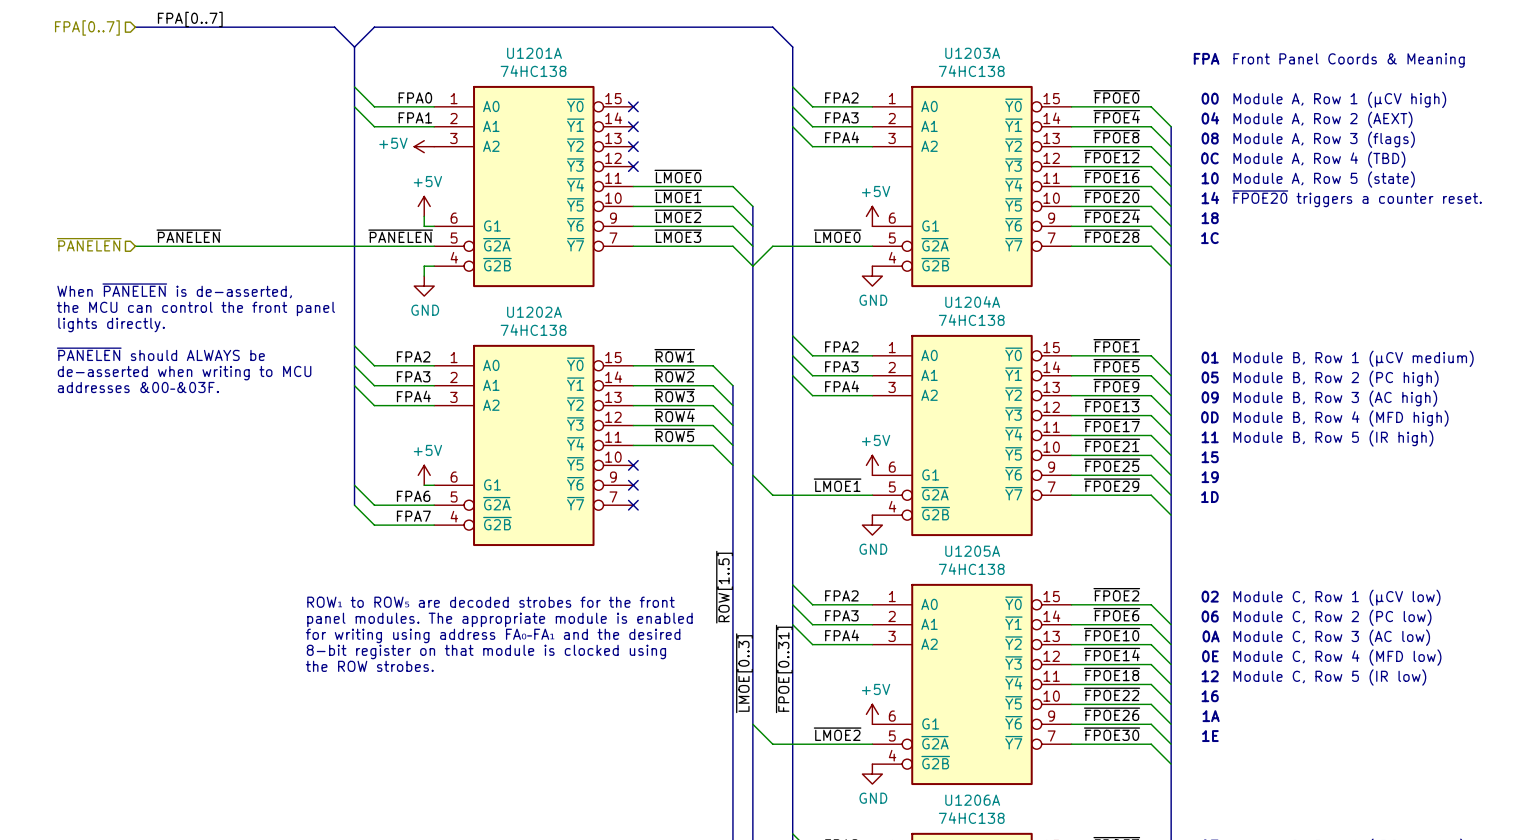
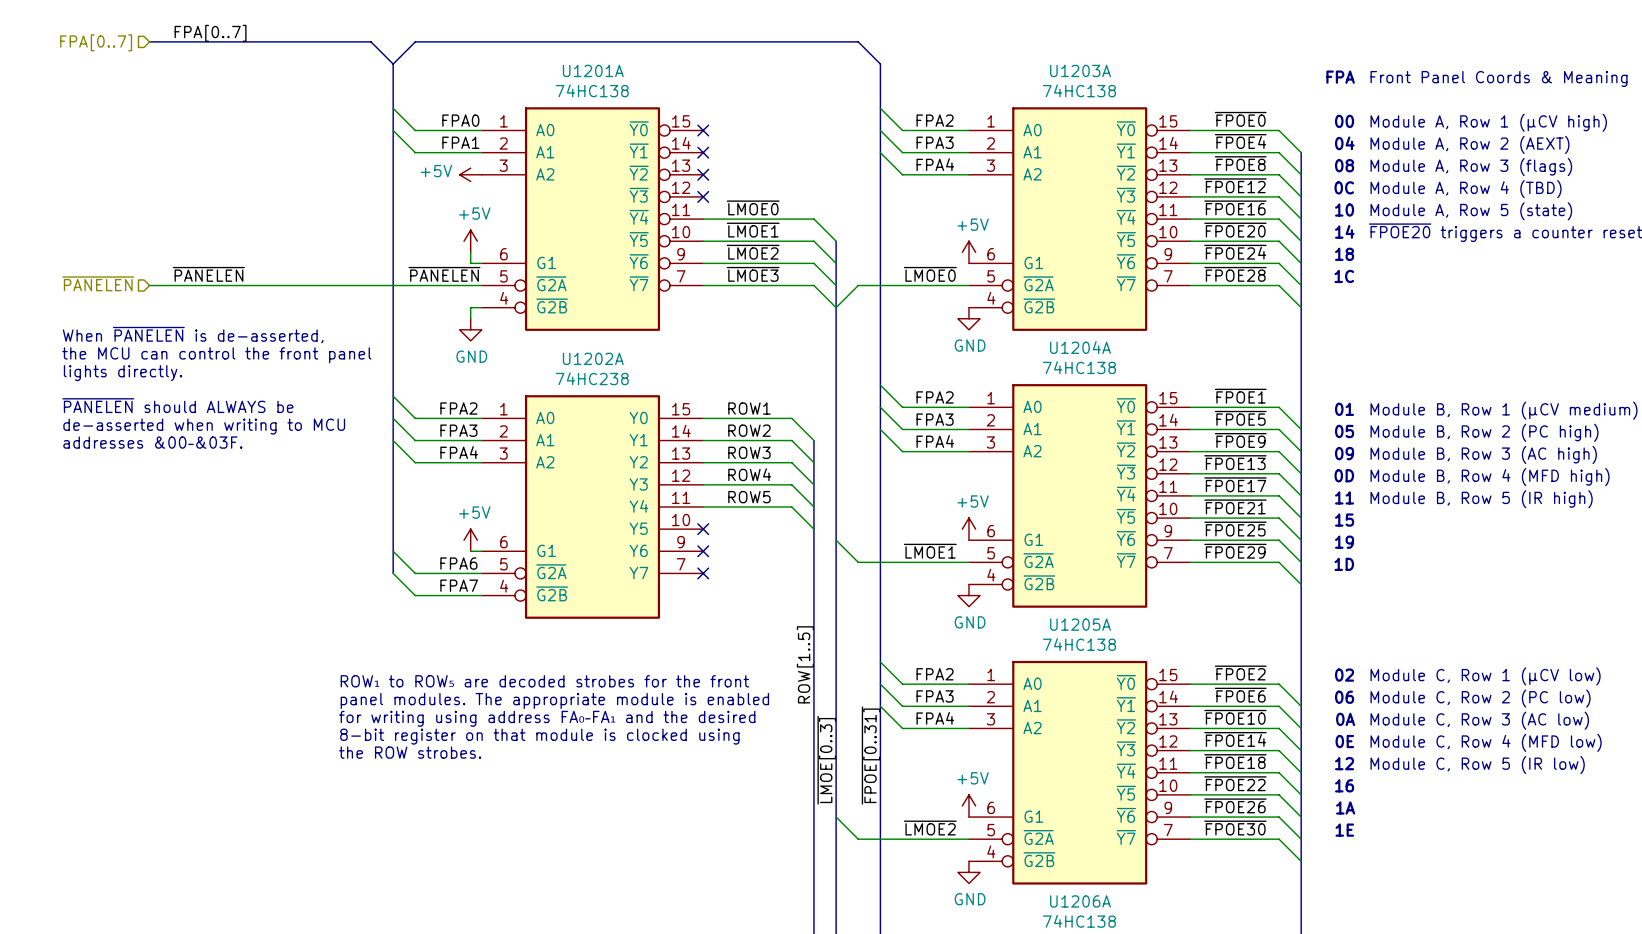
U1202A value: 74HC138 (533, 330) -> 74HC238 (592, 378)
U1202A symbol: [434, 344, 634, 547] -> [481, 395, 704, 619]
label: ~{ROW1} (674, 355) -> ROW1 (749, 408)
label: ~{ROW2} (674, 375) -> ROW2 (749, 430)
label: ~{ROW3} (674, 395) -> ROW3 (749, 452)
label: ~{ROW4} (674, 415) -> ROW4 (749, 474)
label: ~{ROW5} (674, 435) -> ROW5 (749, 497)
label: ~{ROW[1..5]} (724, 587) -> ROW[1..5] (805, 664)

